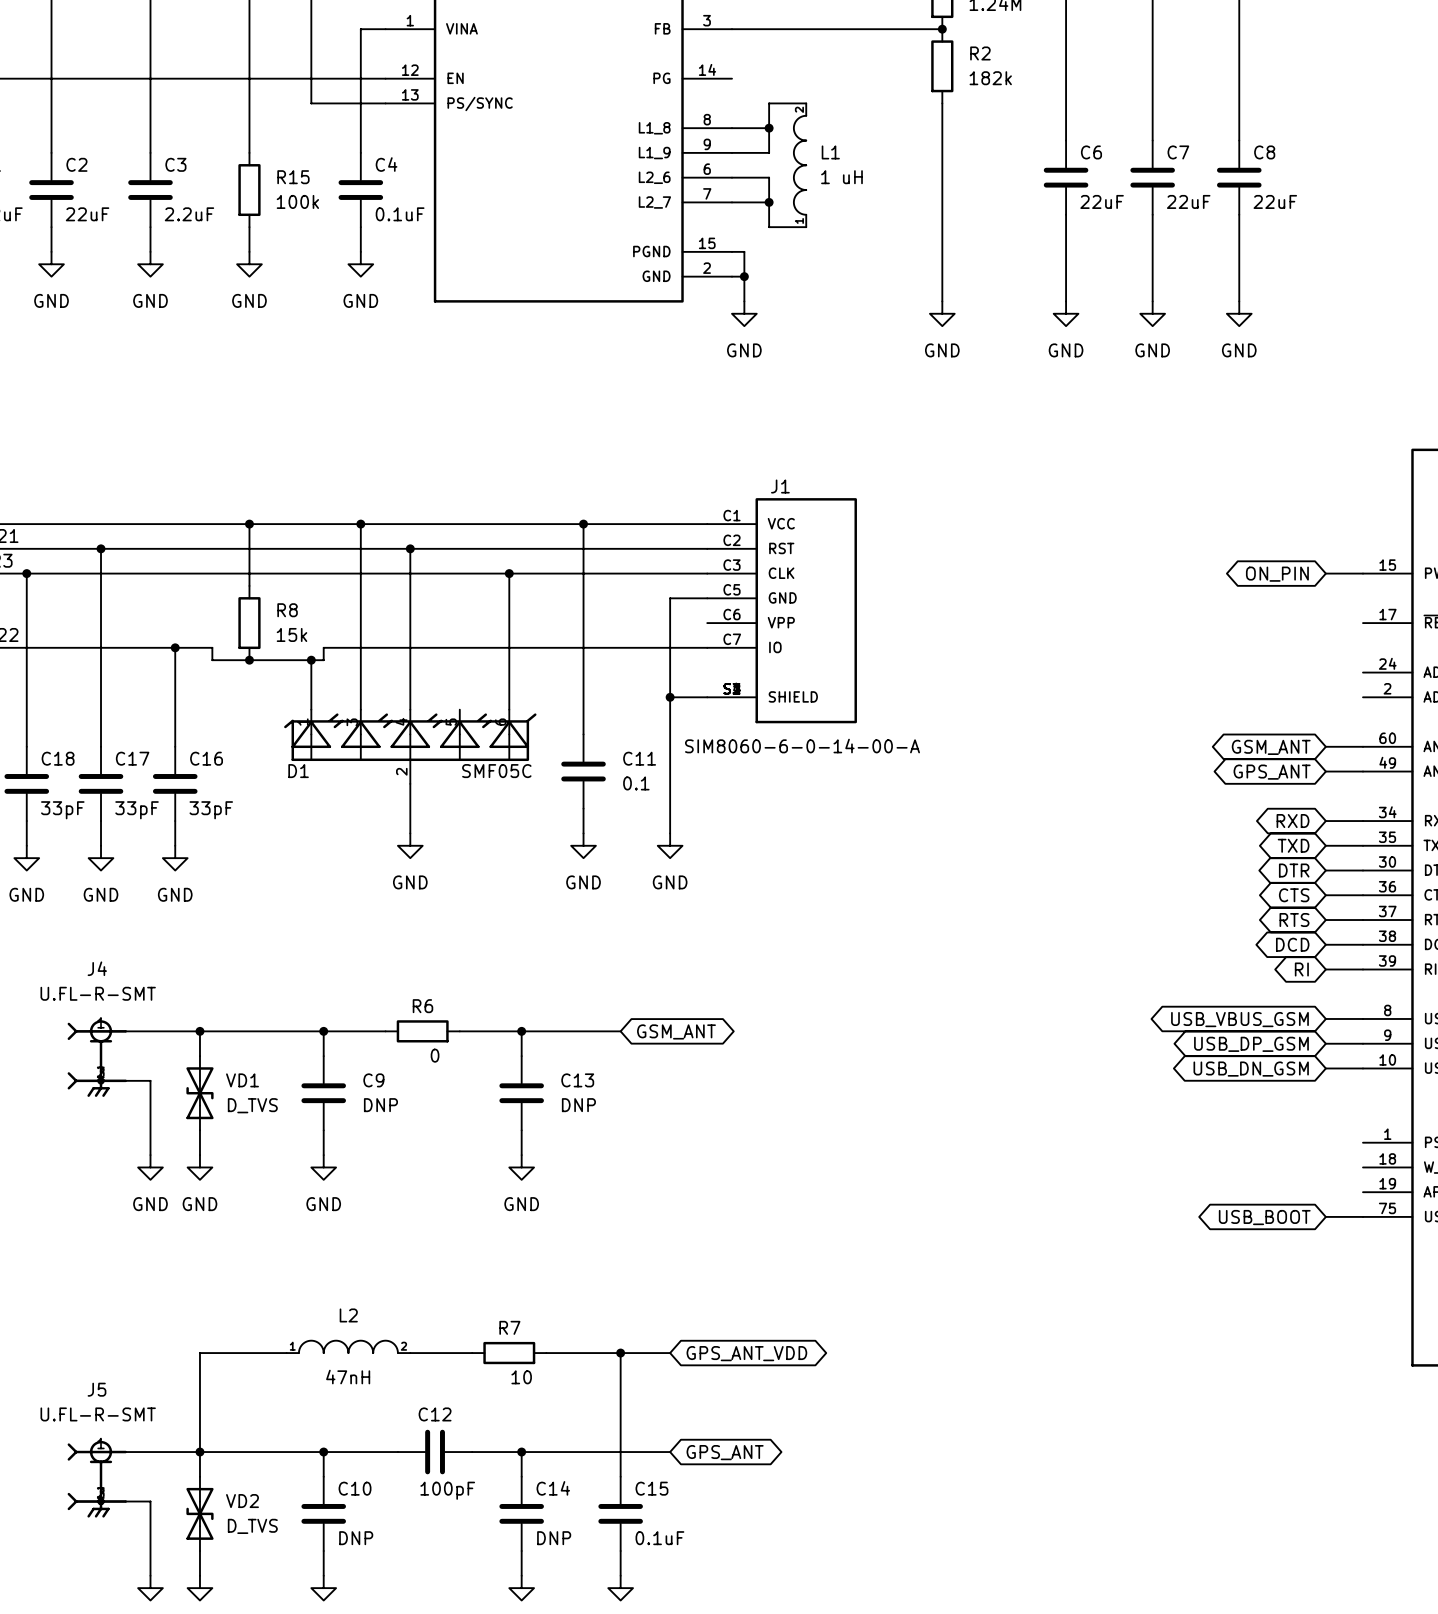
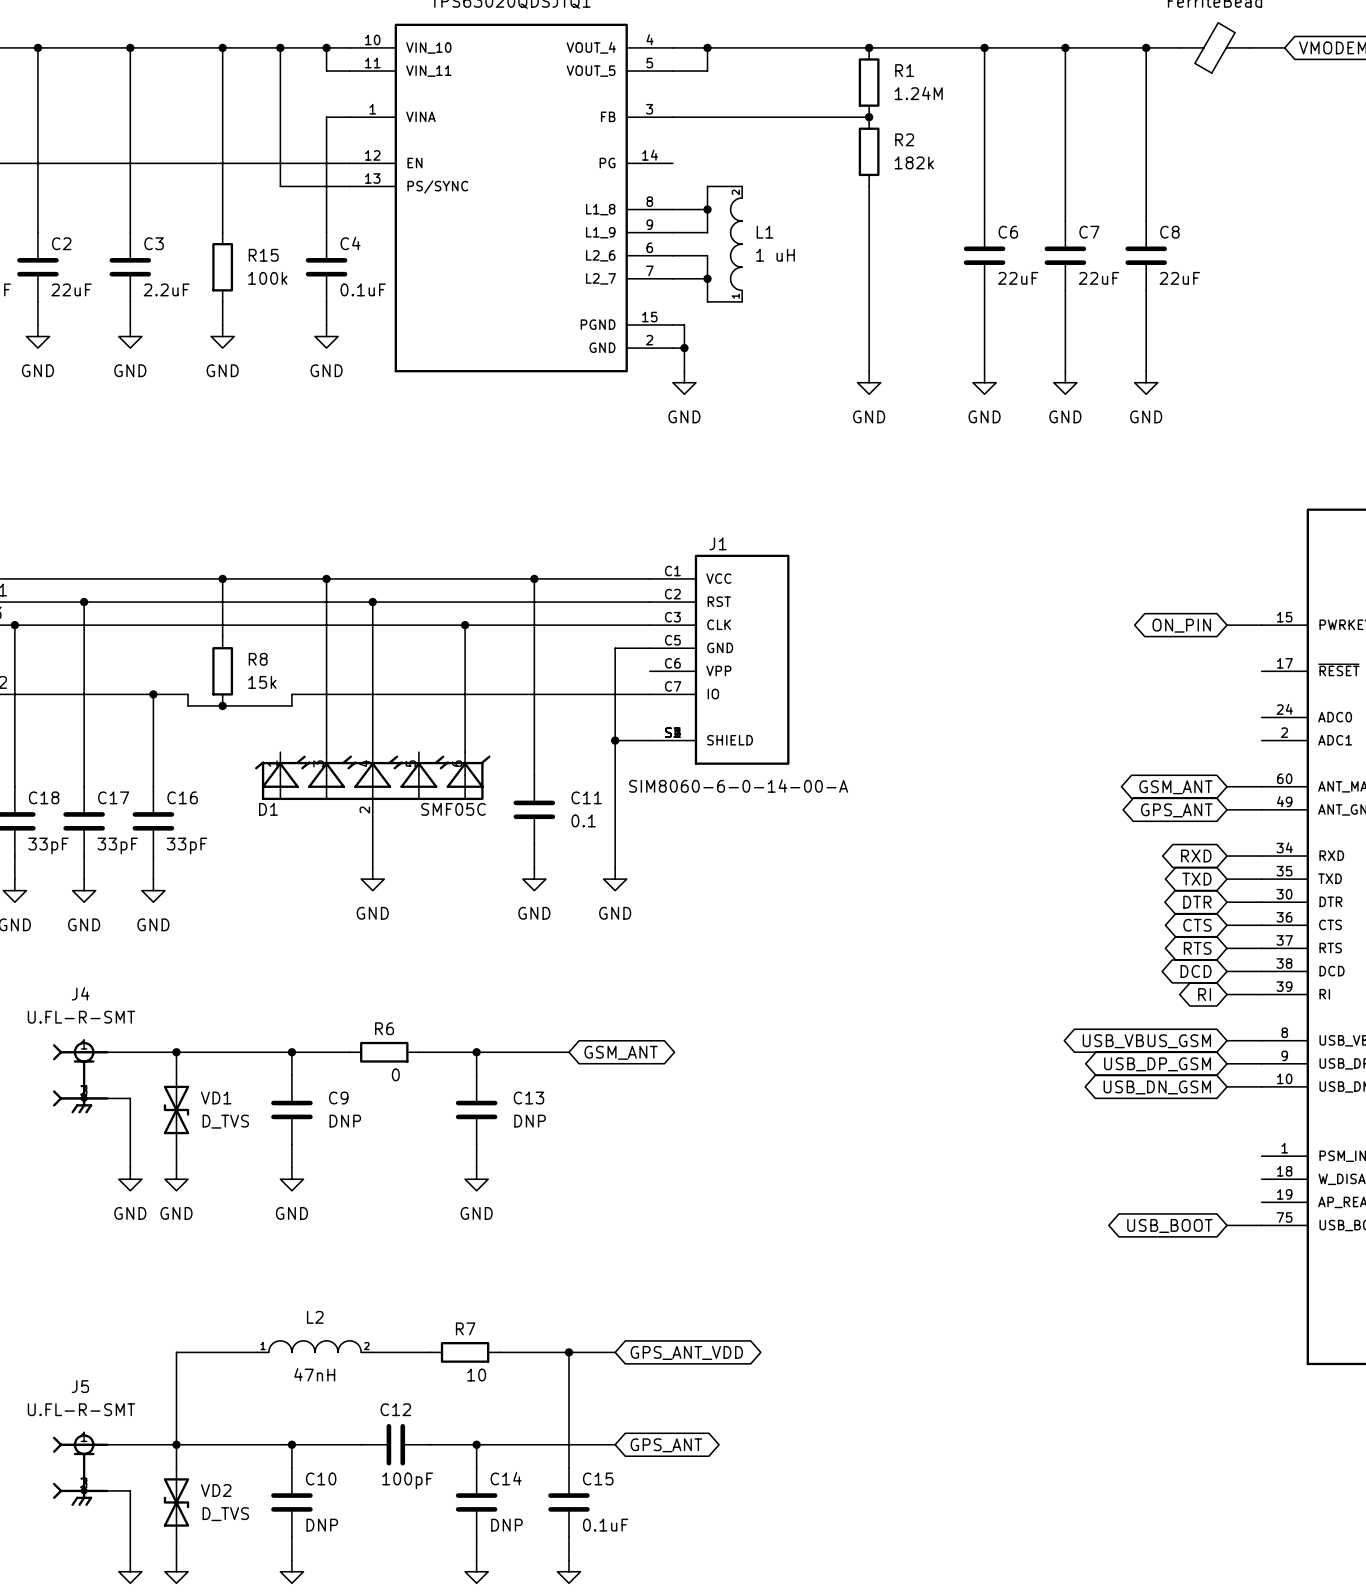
wire: (311, 660) (311, 709) -> none
junction: (311, 660) -> none

